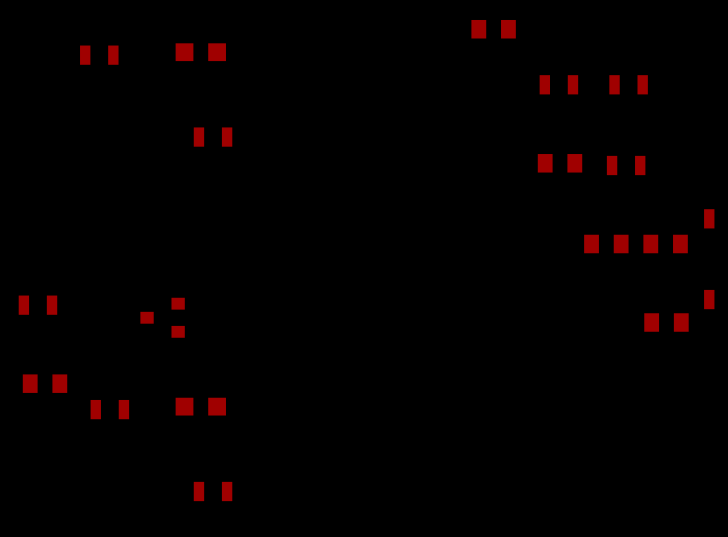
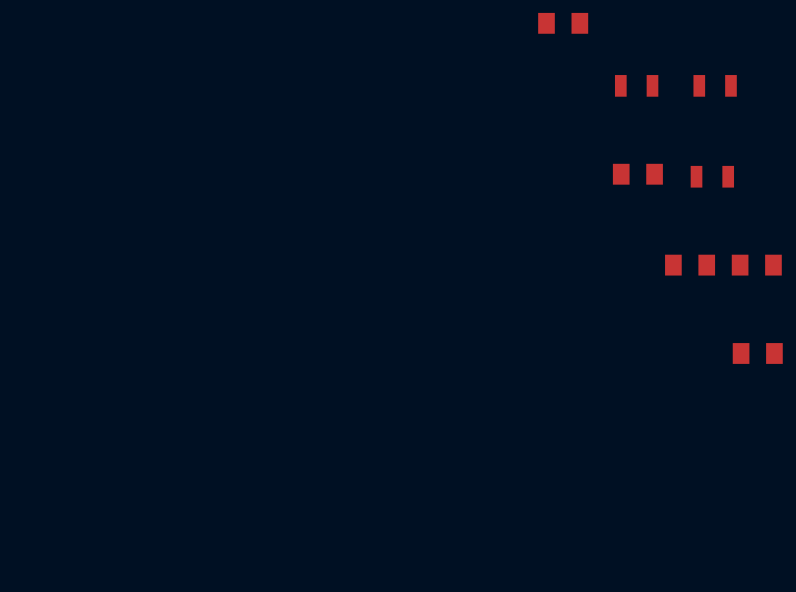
part: (200, 52) -> none
part: (99, 55) -> none
part: (213, 137) -> none
part: (37, 305) -> none
part: (162, 317) -> none
part: (45, 383) -> none
part: (200, 406) -> none
part: (109, 409) -> none
part: (213, 491) -> none

